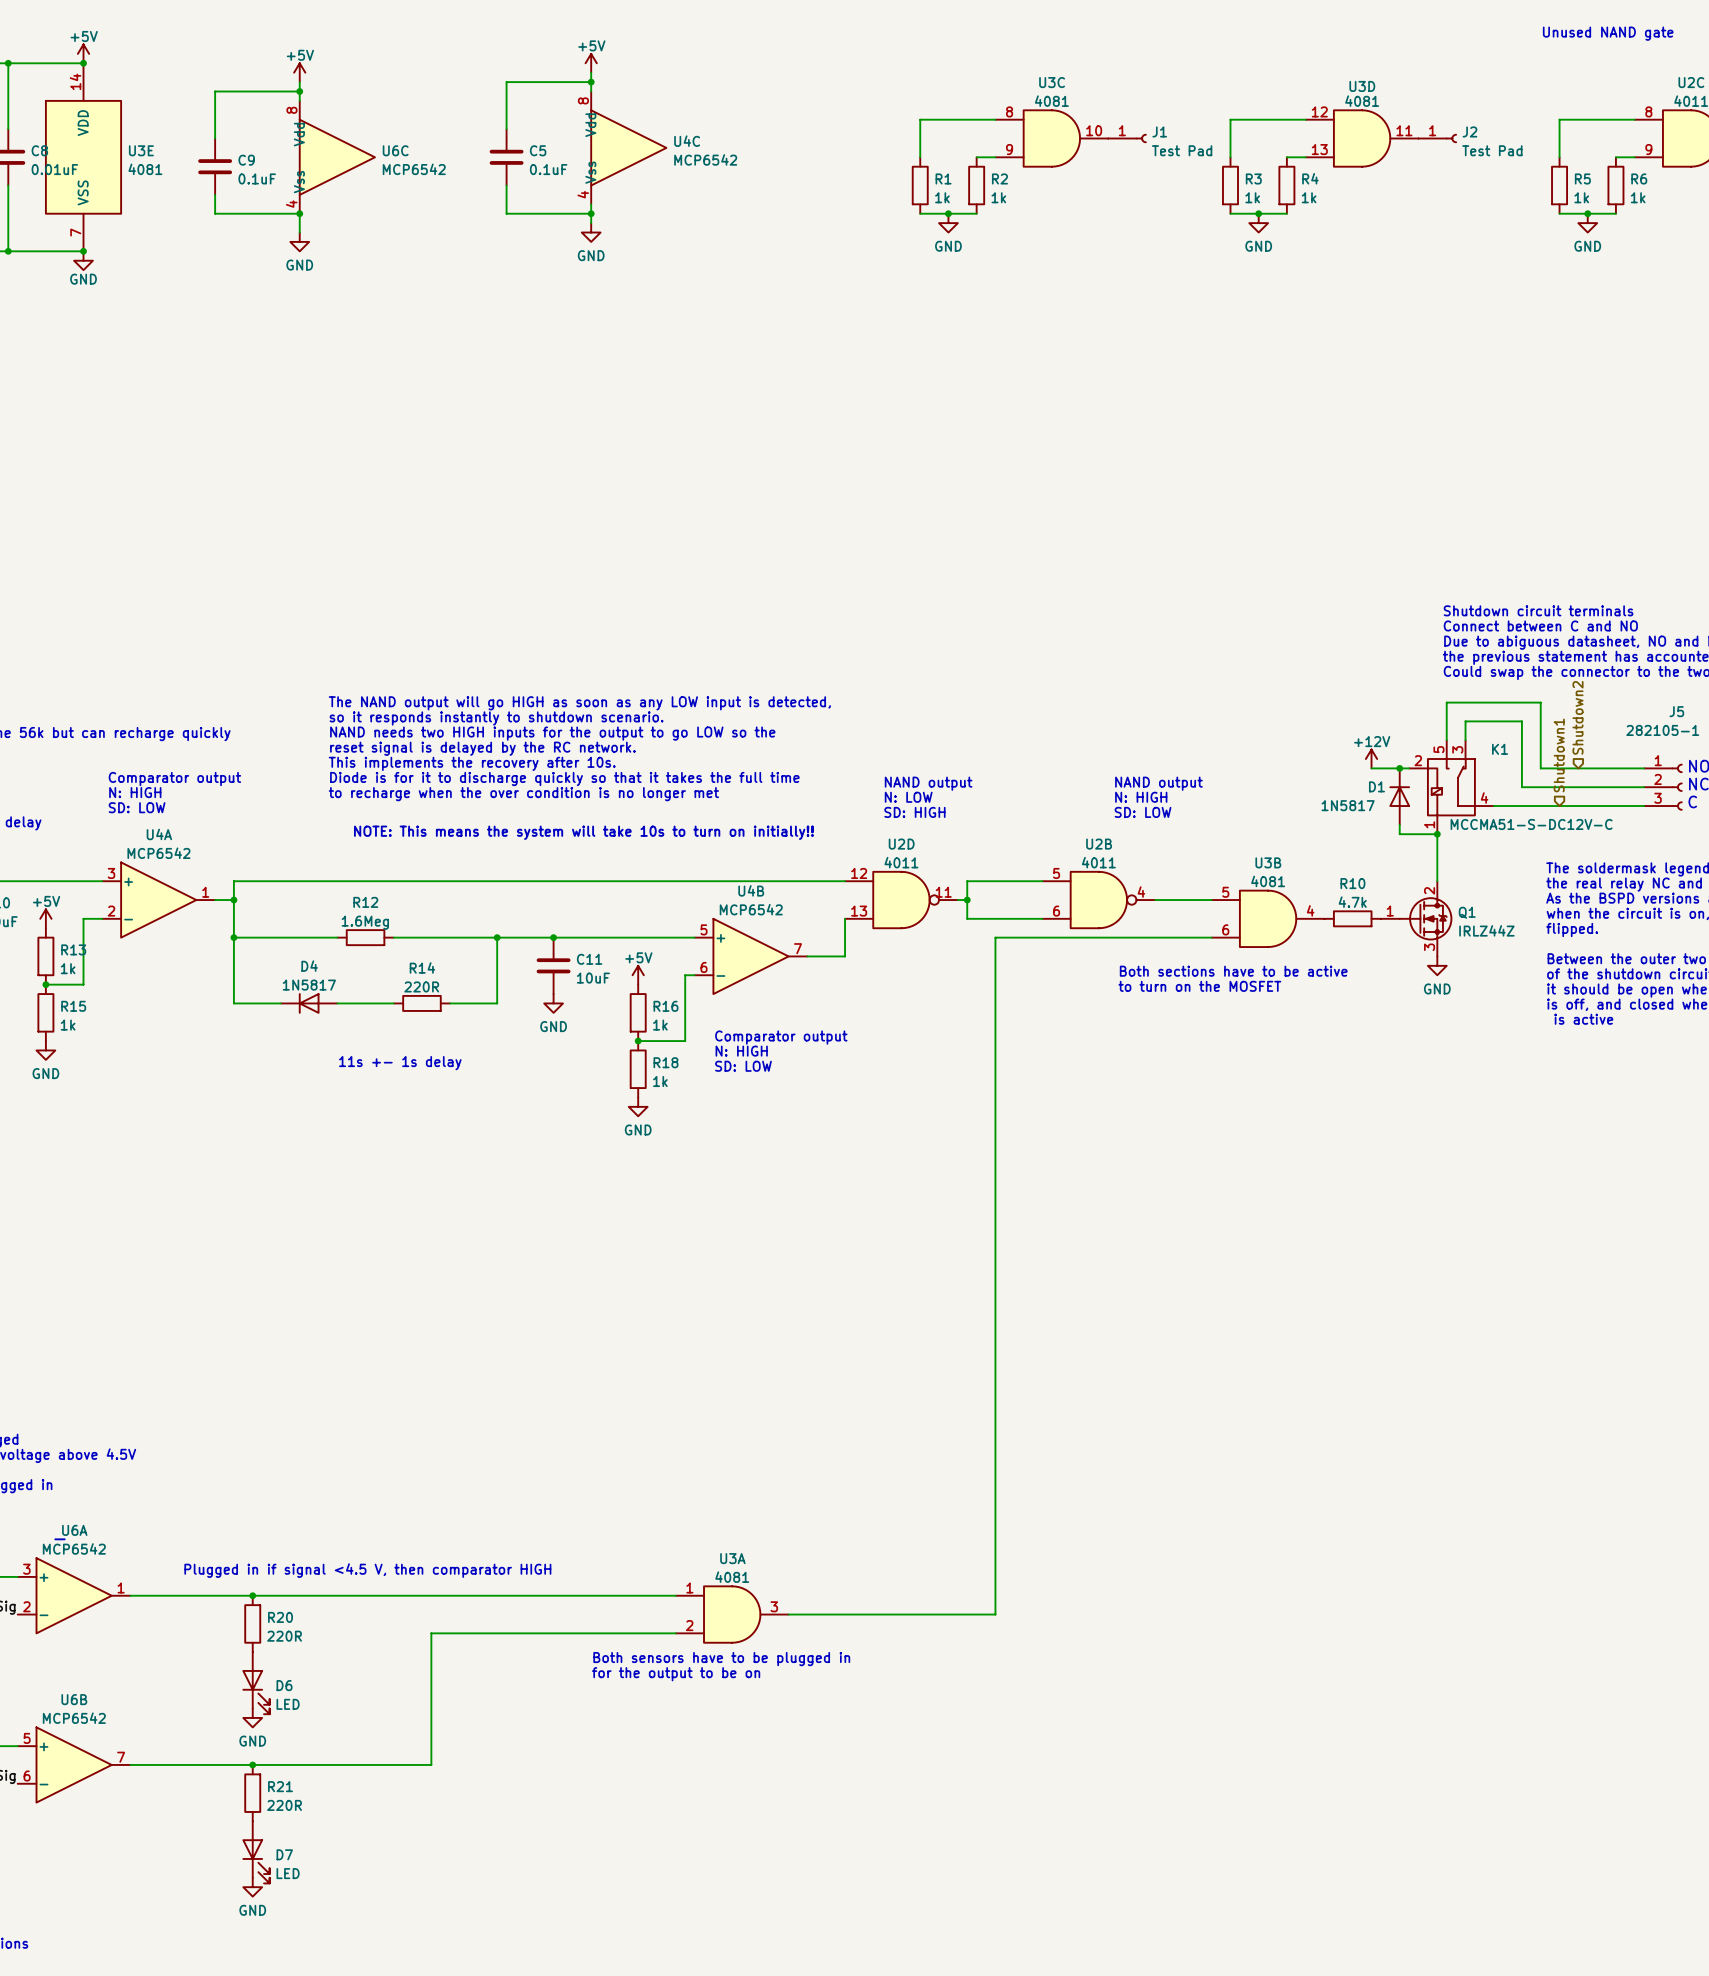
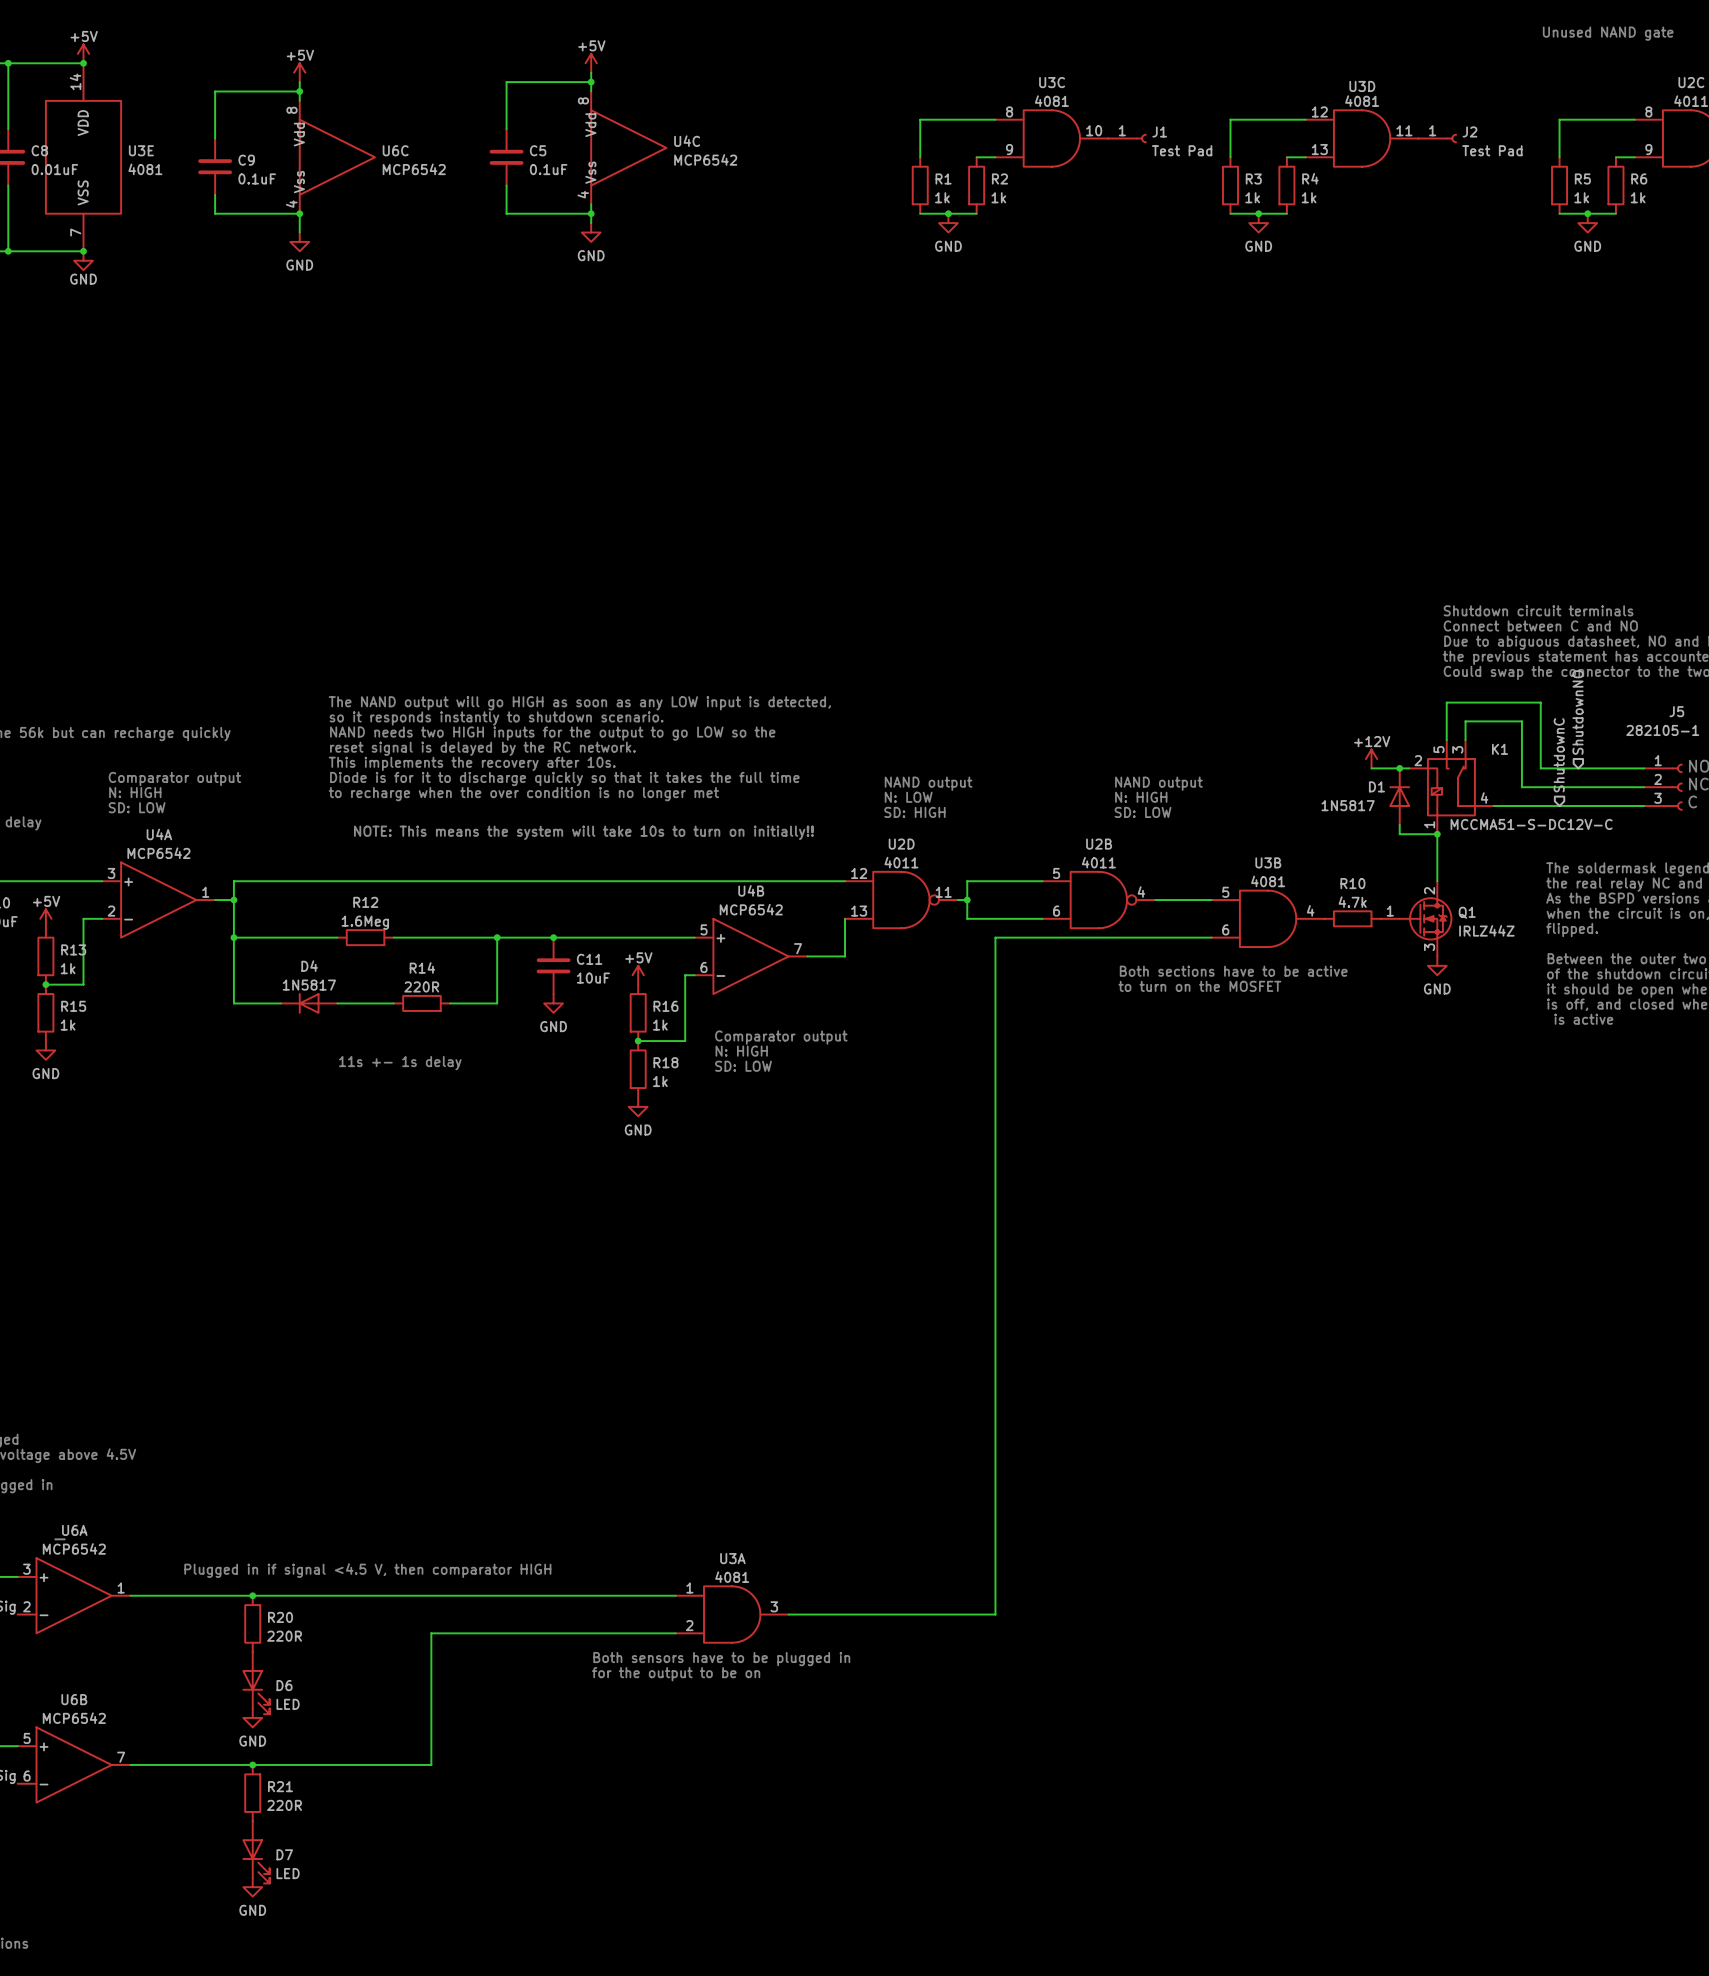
hierarchical label: Shutdown2 (1578, 717) -> ShutdownNO (1578, 712)
hierarchical label: Shutdown1 (1559, 755) -> ShutdownC (1559, 755)

